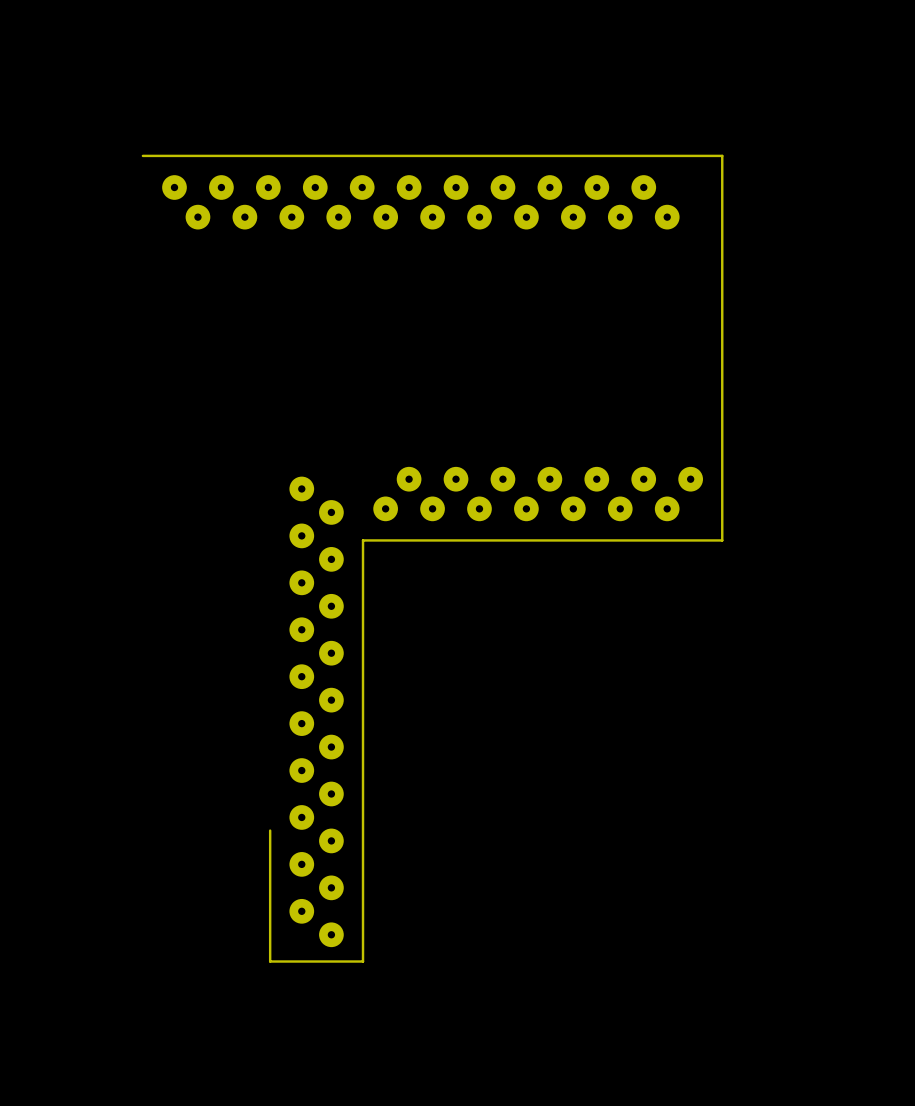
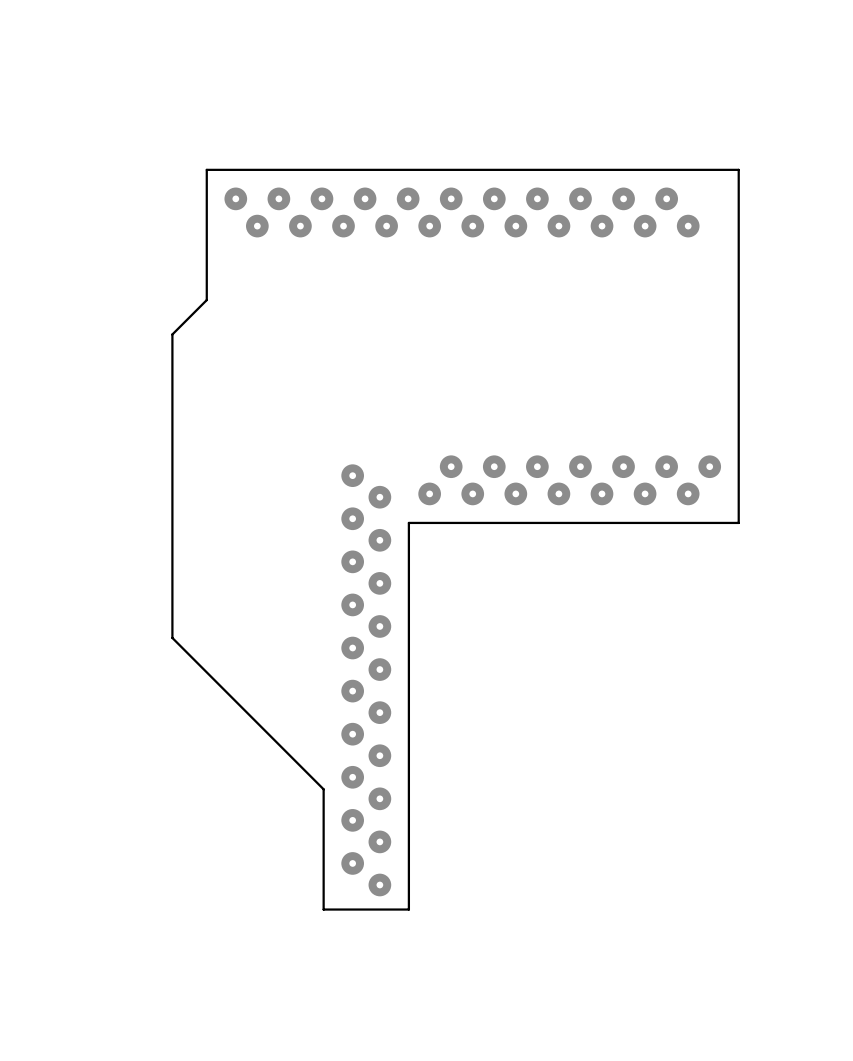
board edge: none -> (206, 169) (206, 300) (172, 334) (172, 637) (323, 789)

